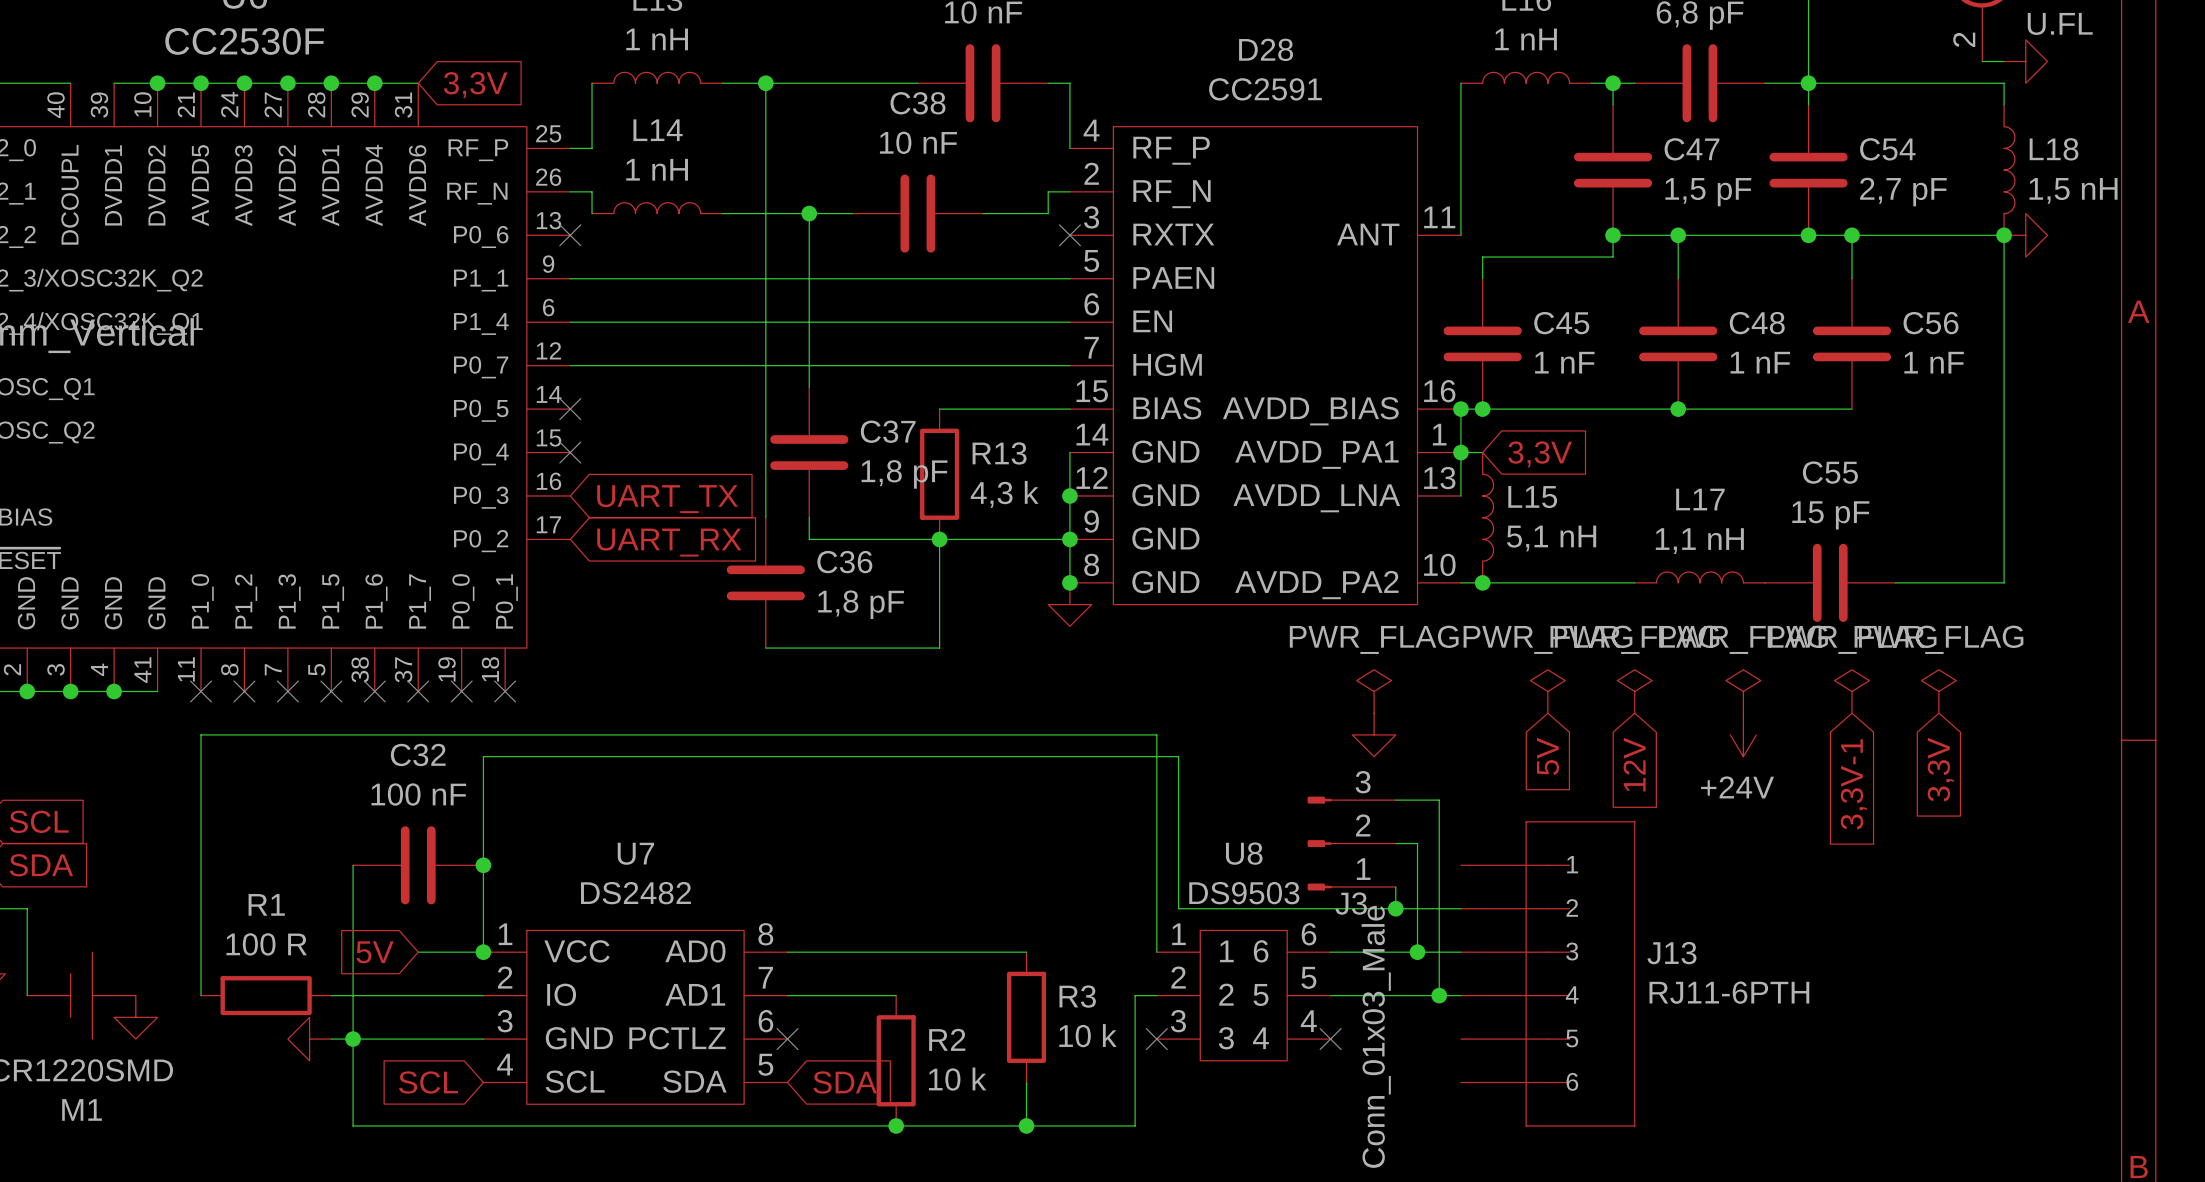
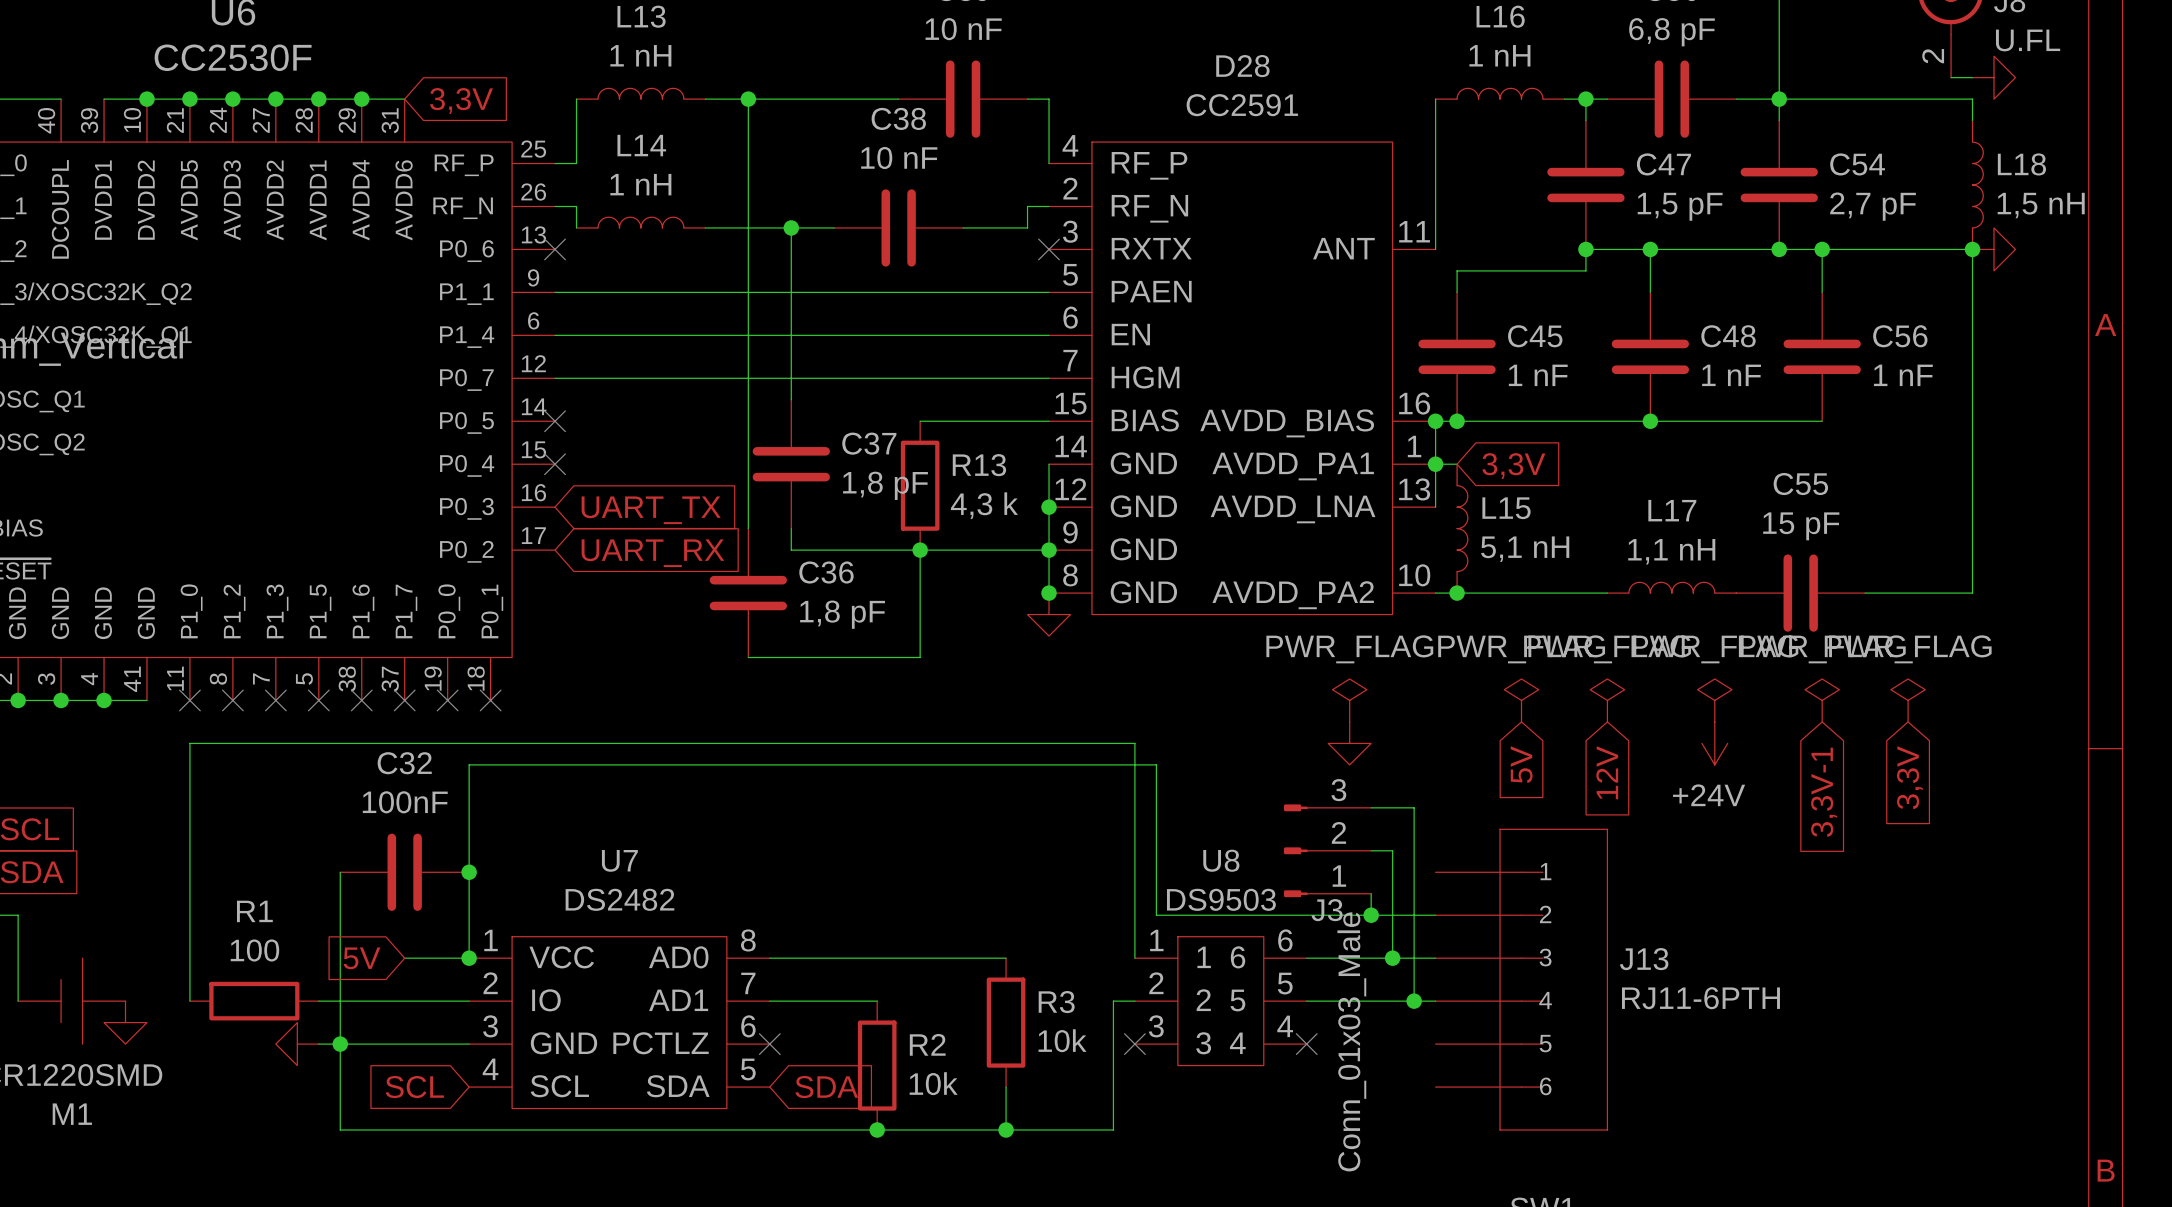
C32 value: 100 nF (418, 794) -> 100nF (405, 802)
R1 value: 100 R (266, 944) -> 100 (254, 950)
R3 value: 10 k (1087, 1035) -> 10k (1062, 1040)
R2 value: 10 k (957, 1079) -> 10k (933, 1083)

